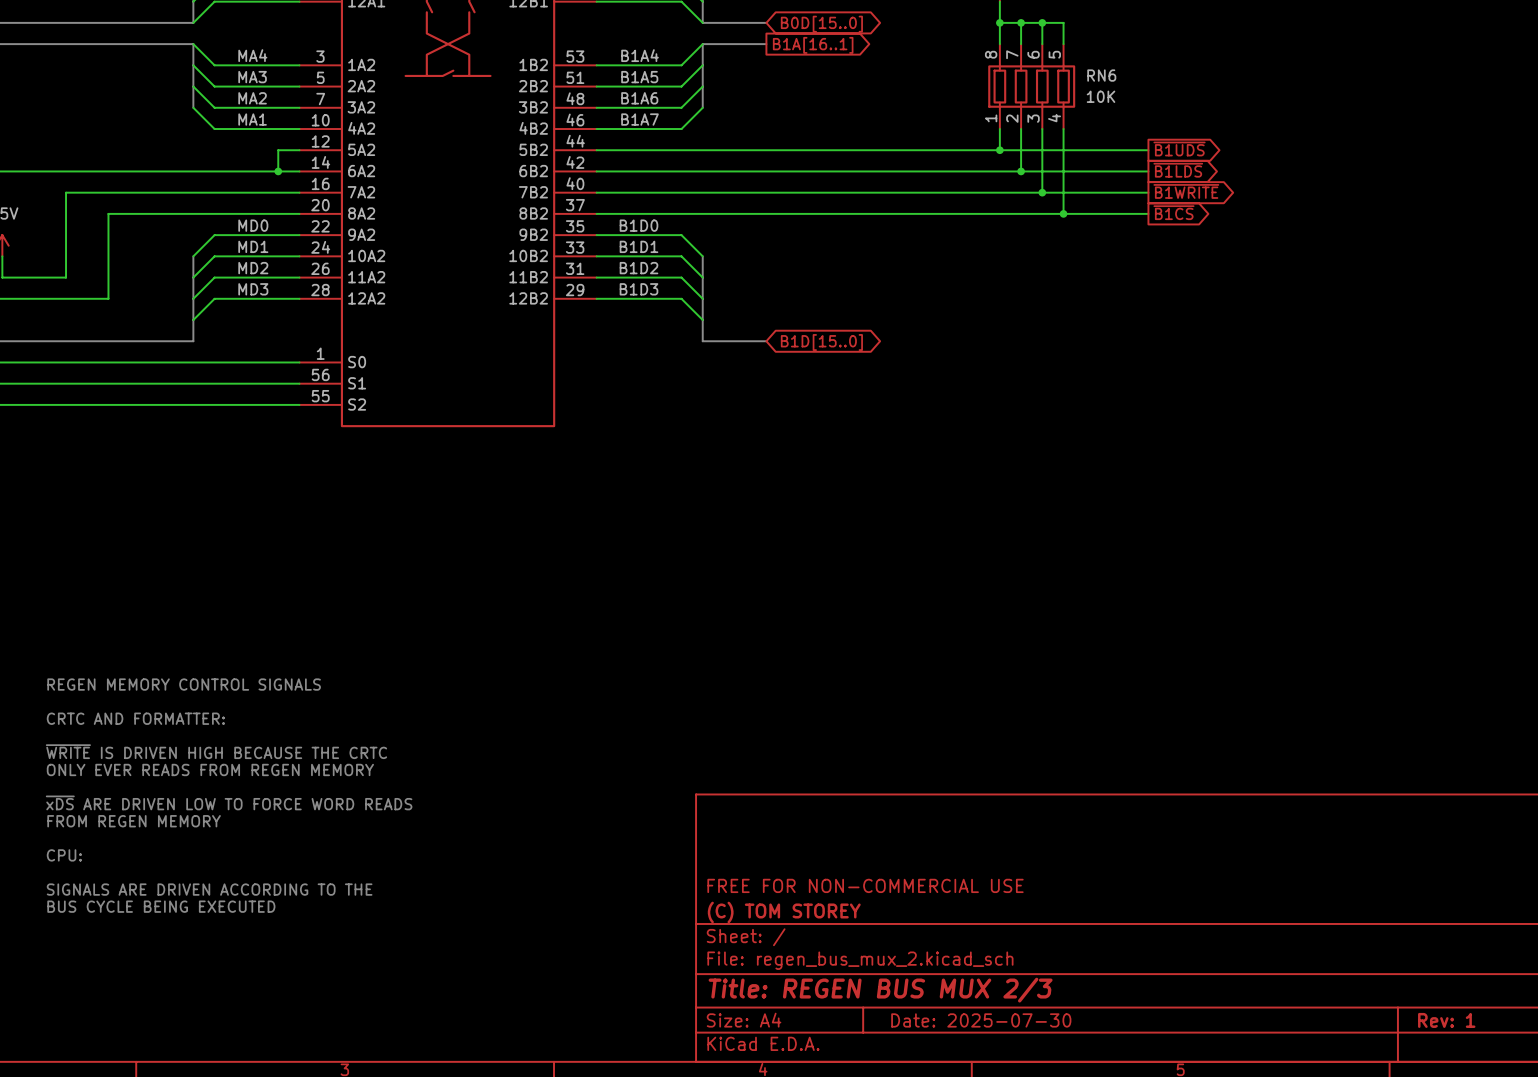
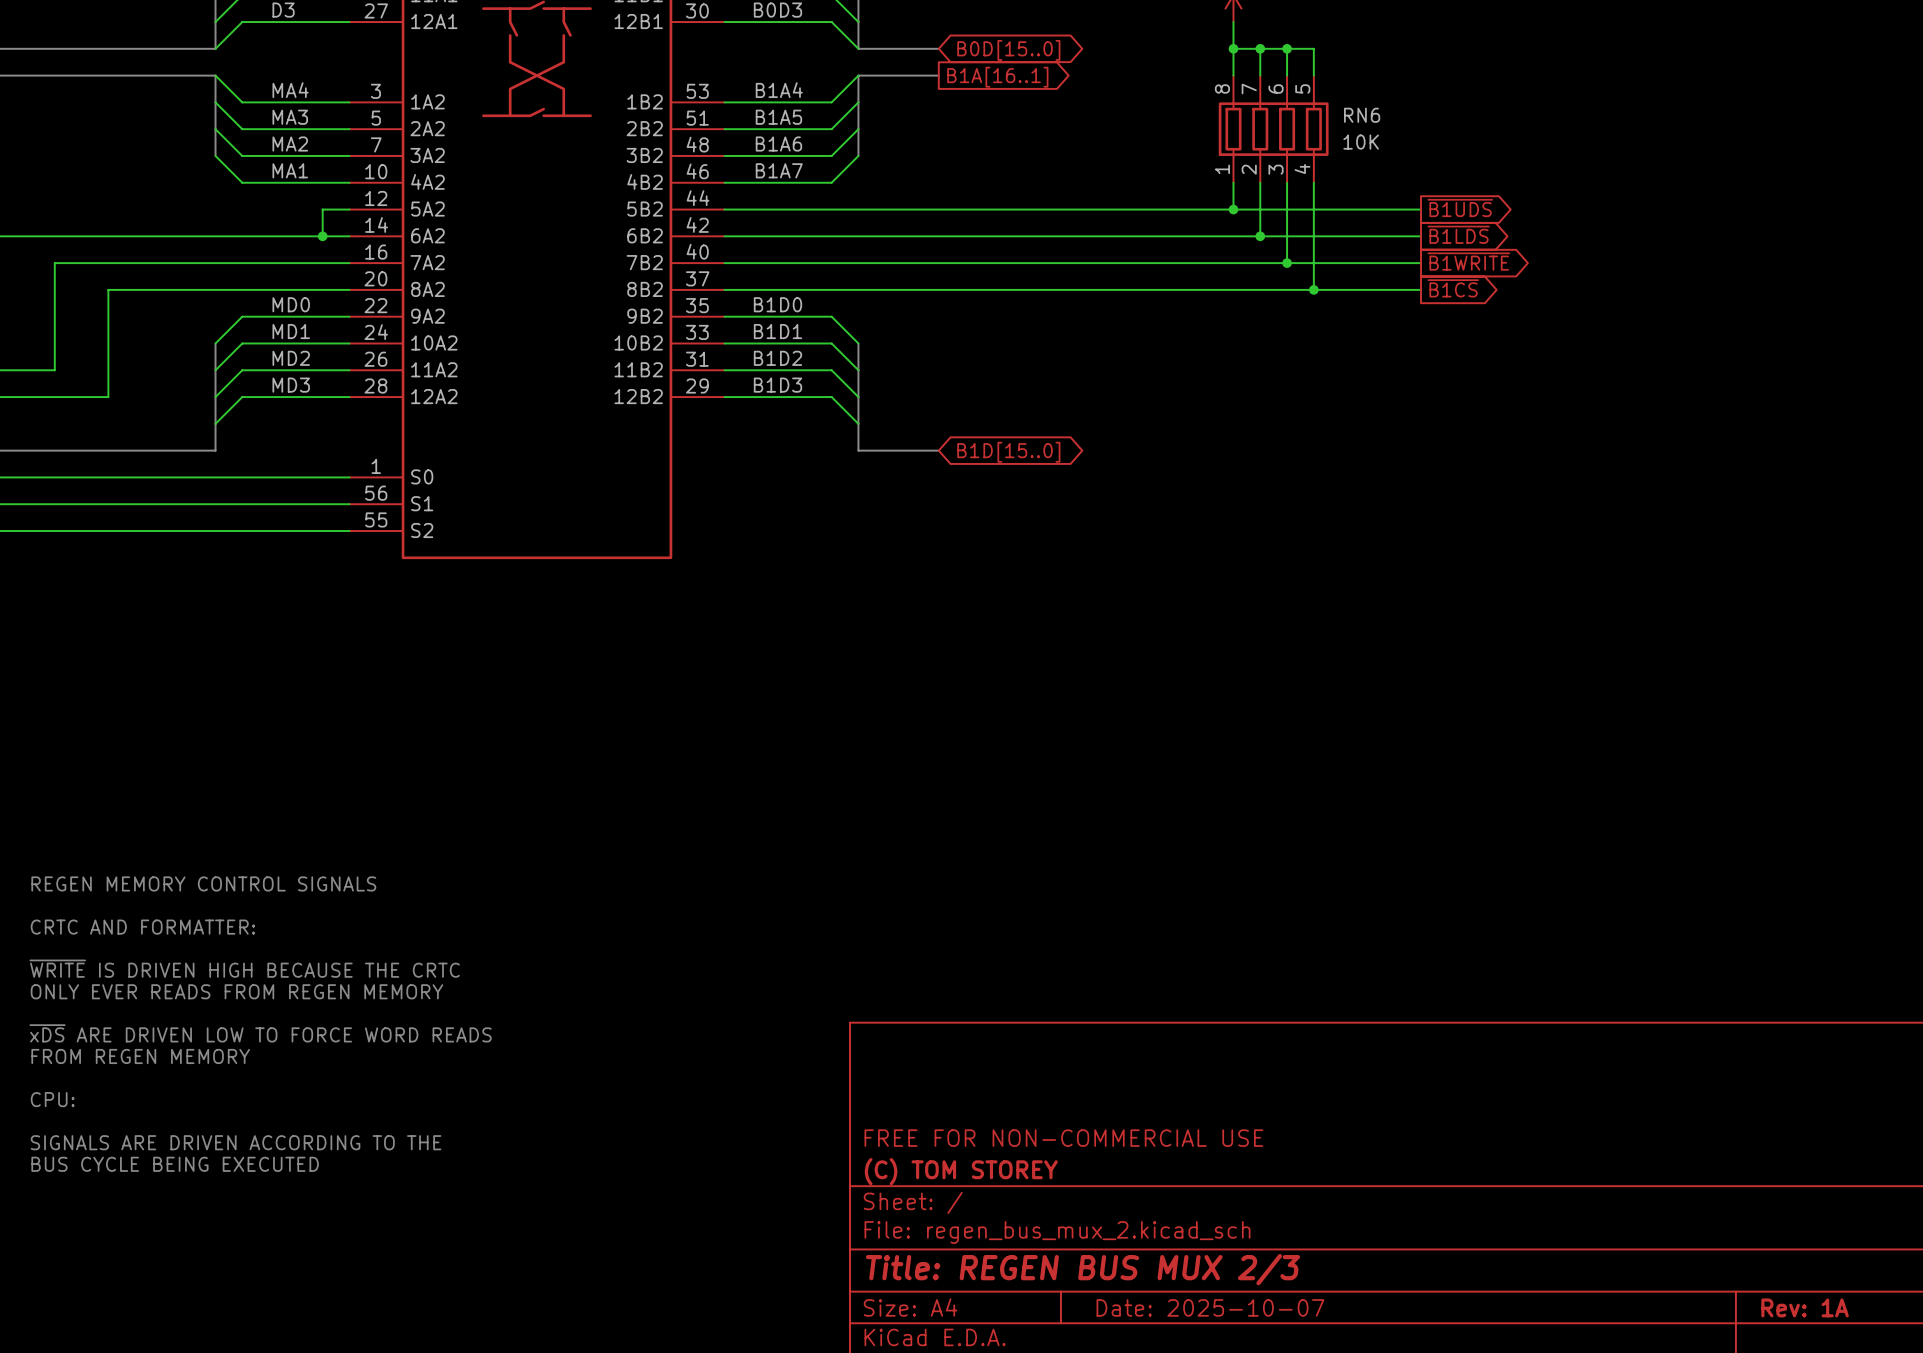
title block: Date: 2025-07-30 (981, 1020) -> Date: 2025-10-07 (1210, 1307)
title block: Rev: 1 (1446, 1020) -> Rev: 1A (1805, 1307)

